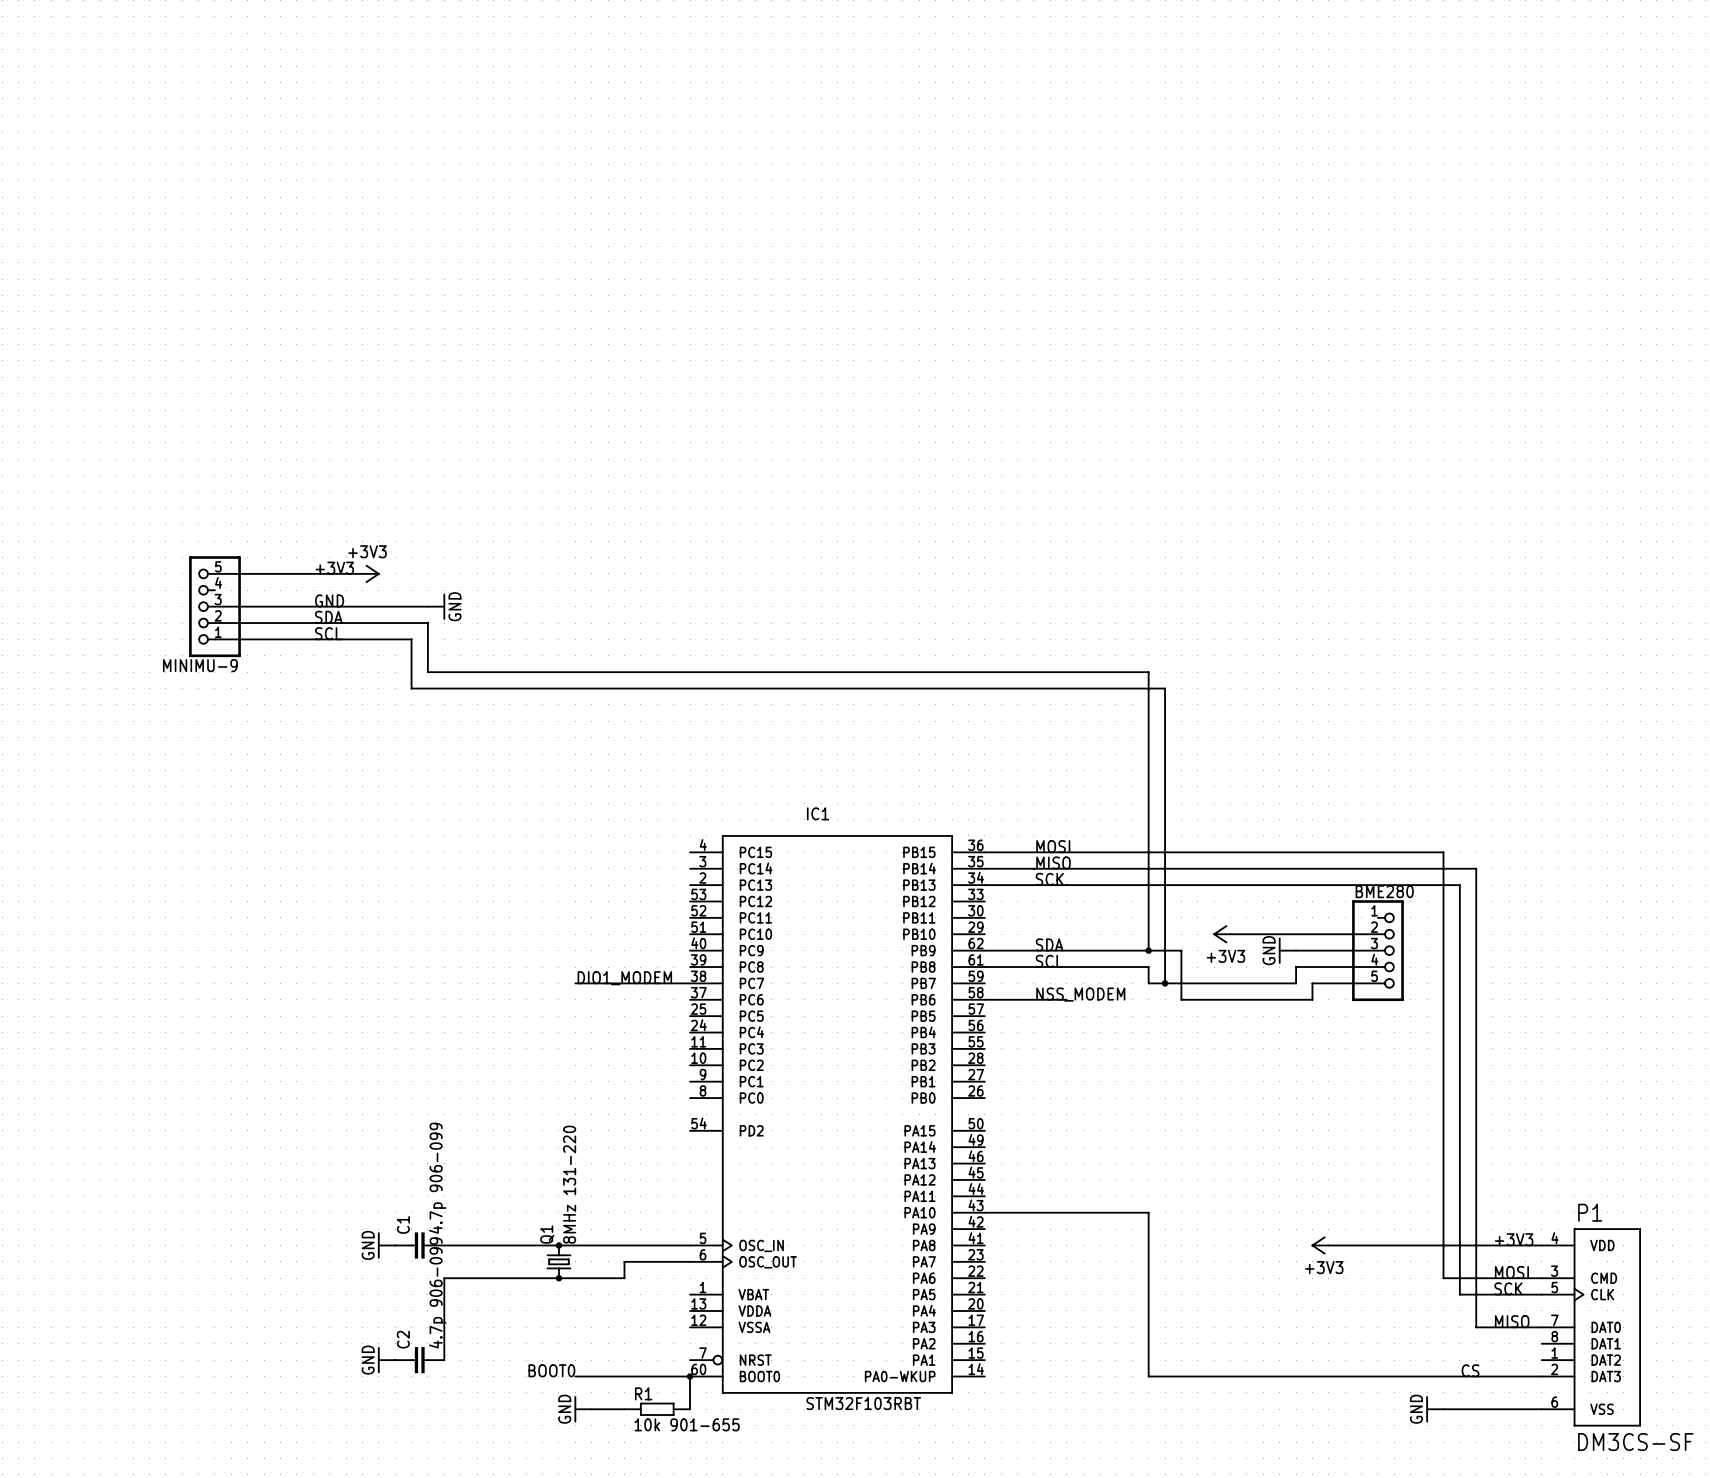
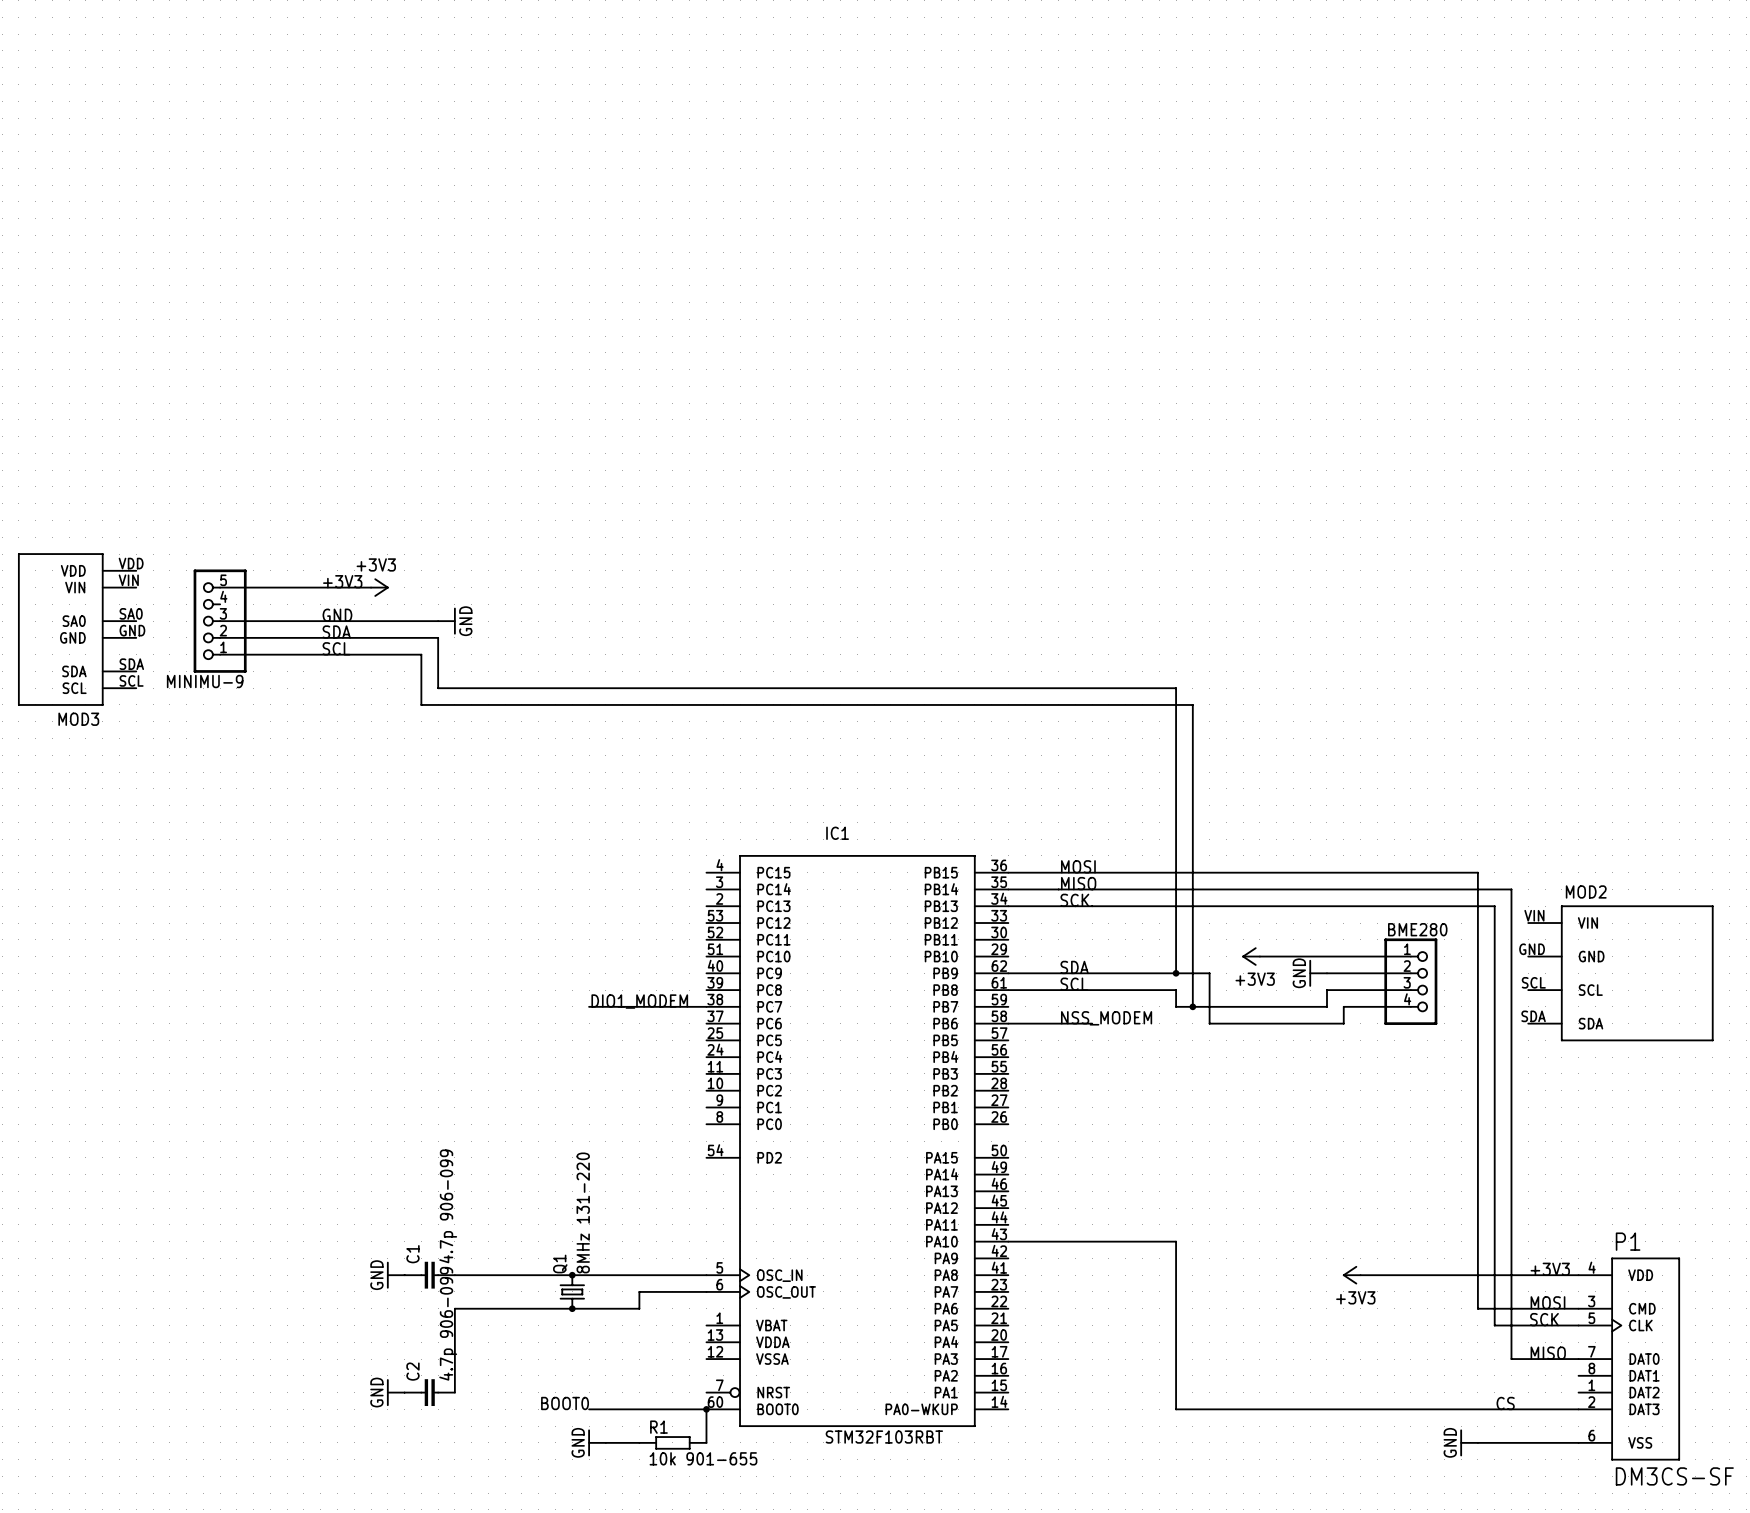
MOD3: none -> (77, 629)
BME280 symbol: [1352, 900, 1404, 1002] -> [1384, 938, 1438, 1025]
MOD2: none -> (1620, 973)

